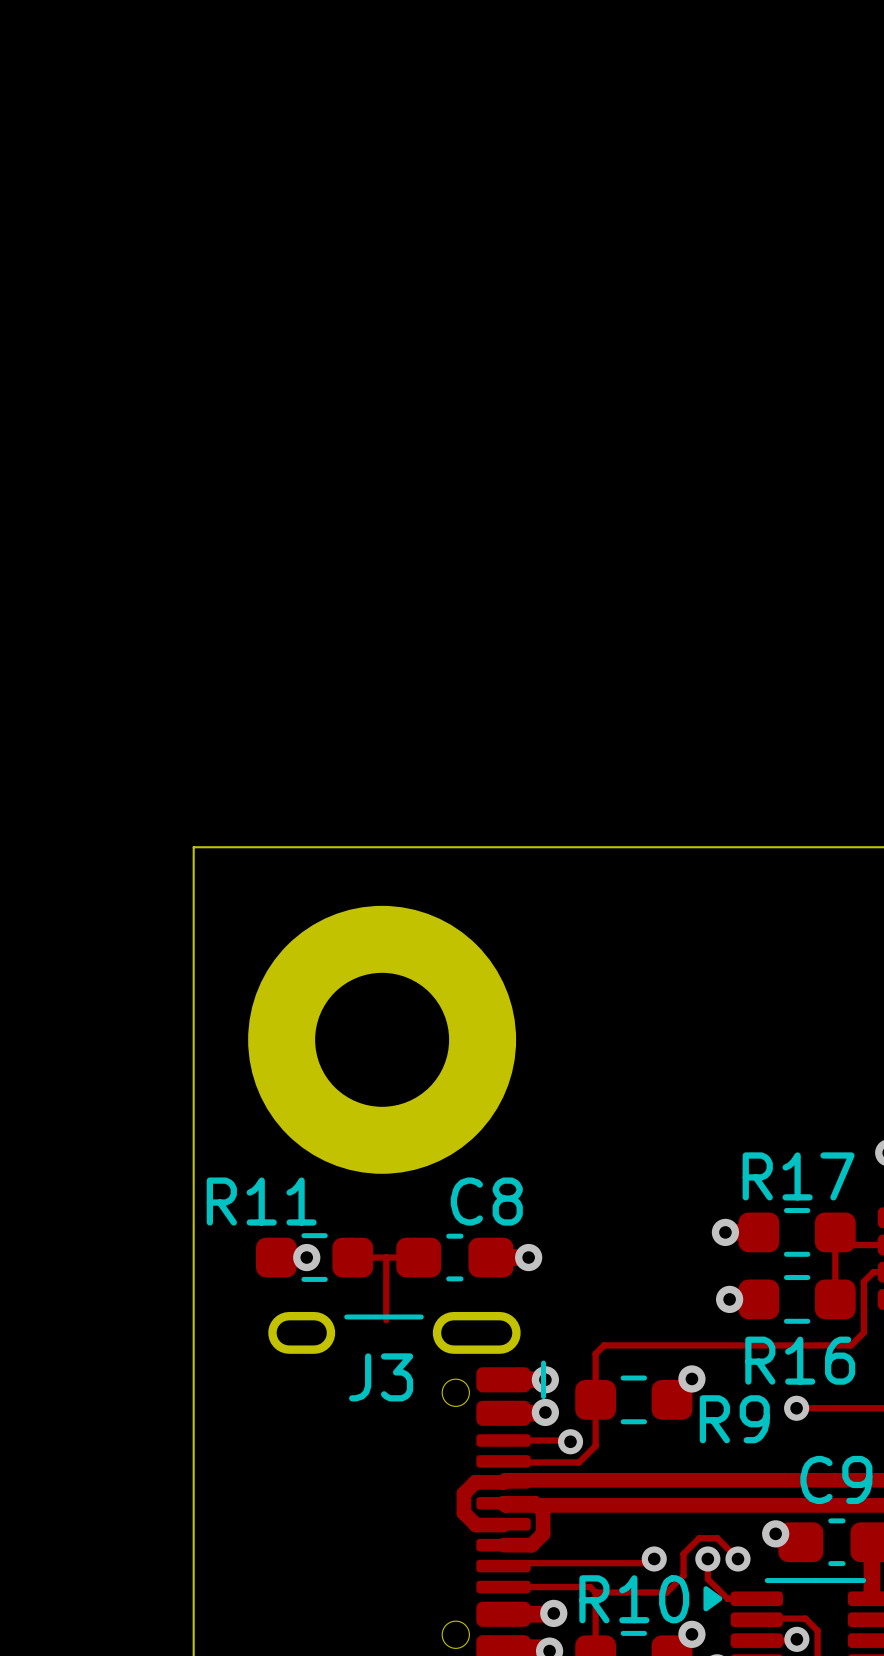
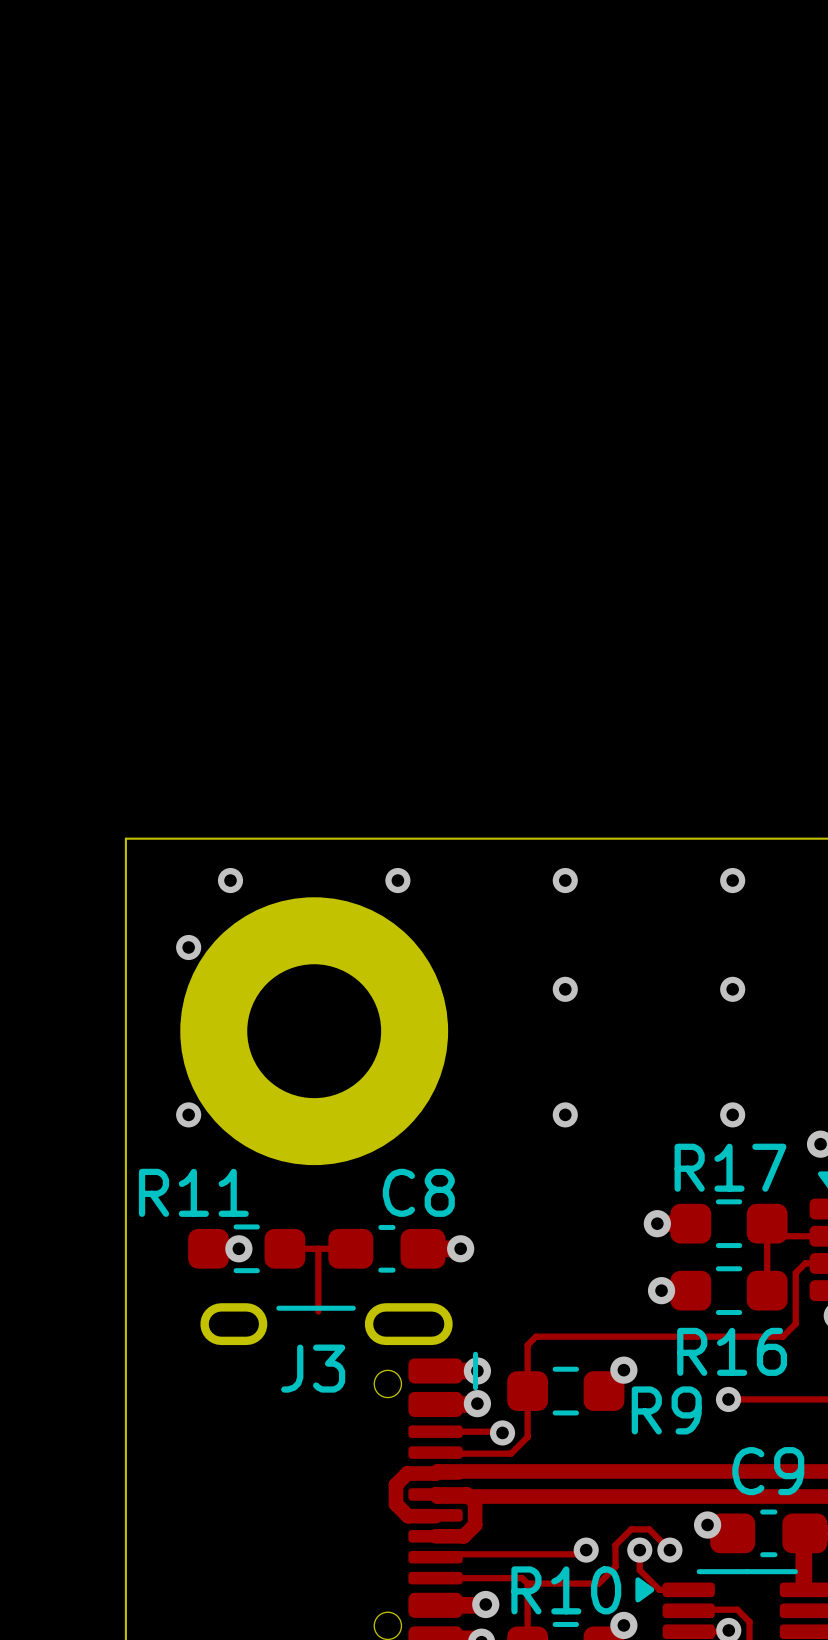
via: none -> (230, 880)
via: none -> (397, 880)
via: none -> (565, 880)
via: none -> (732, 880)
via: none -> (188, 947)
via: none -> (565, 989)
via: none -> (732, 989)
via: none -> (188, 1114)
via: none -> (565, 1114)
via: none -> (732, 1114)

